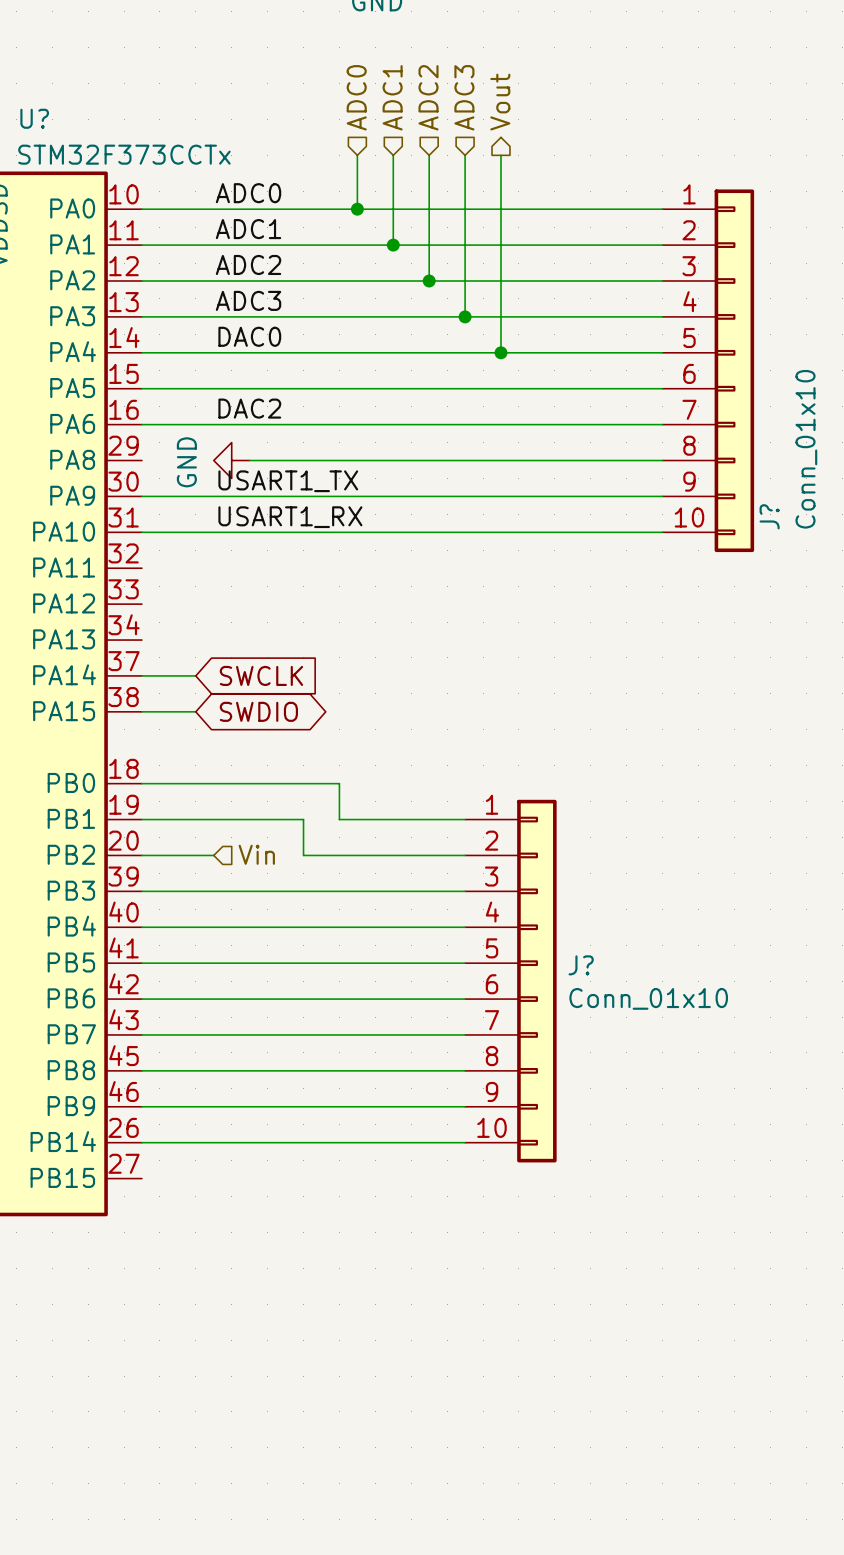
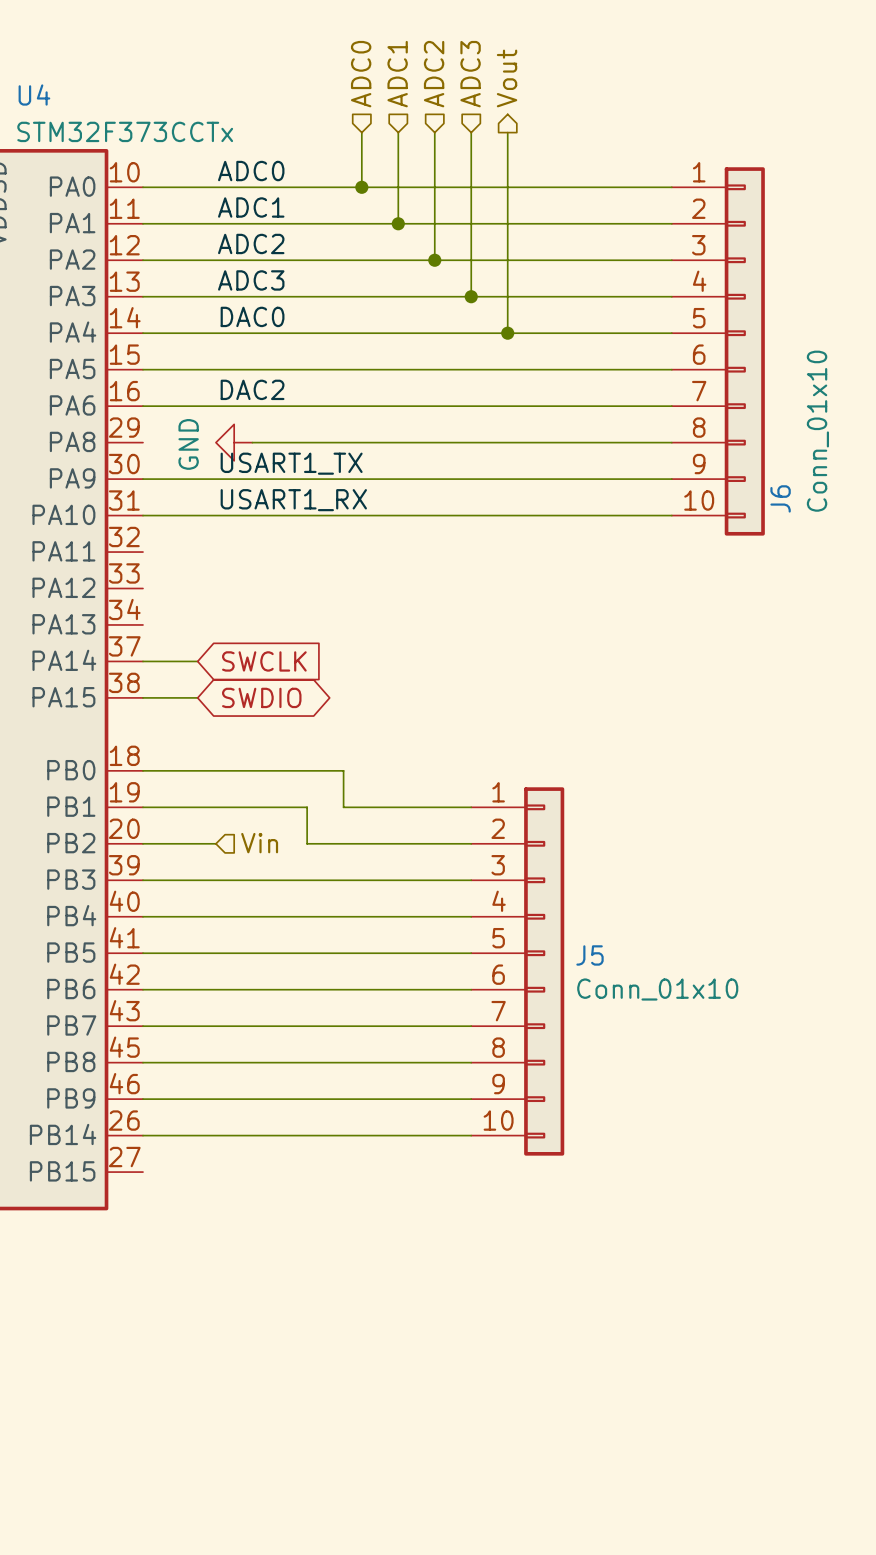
U? name: U? (34, 118) -> U4 (34, 95)
J? name: J? (769, 516) -> J6 (780, 498)
J? name: J? (581, 965) -> J5 (590, 955)

